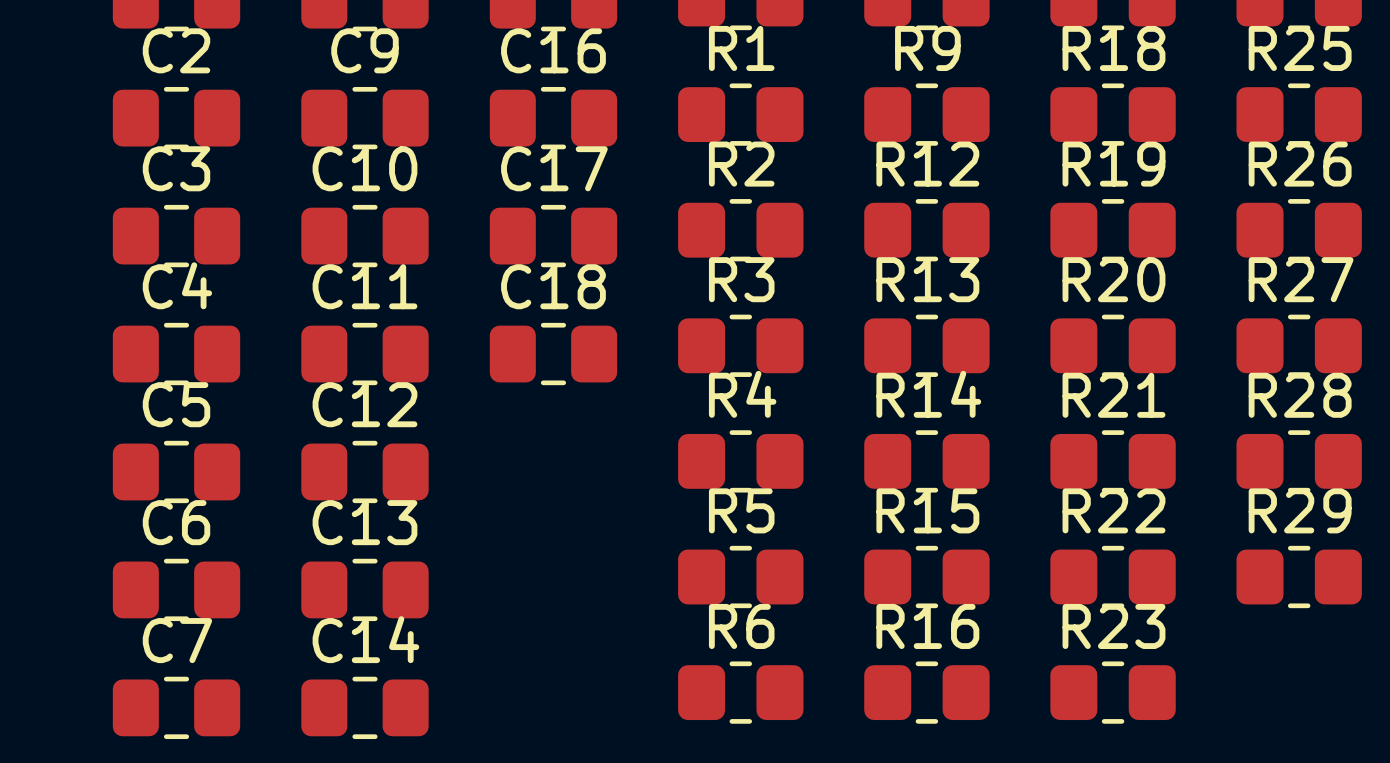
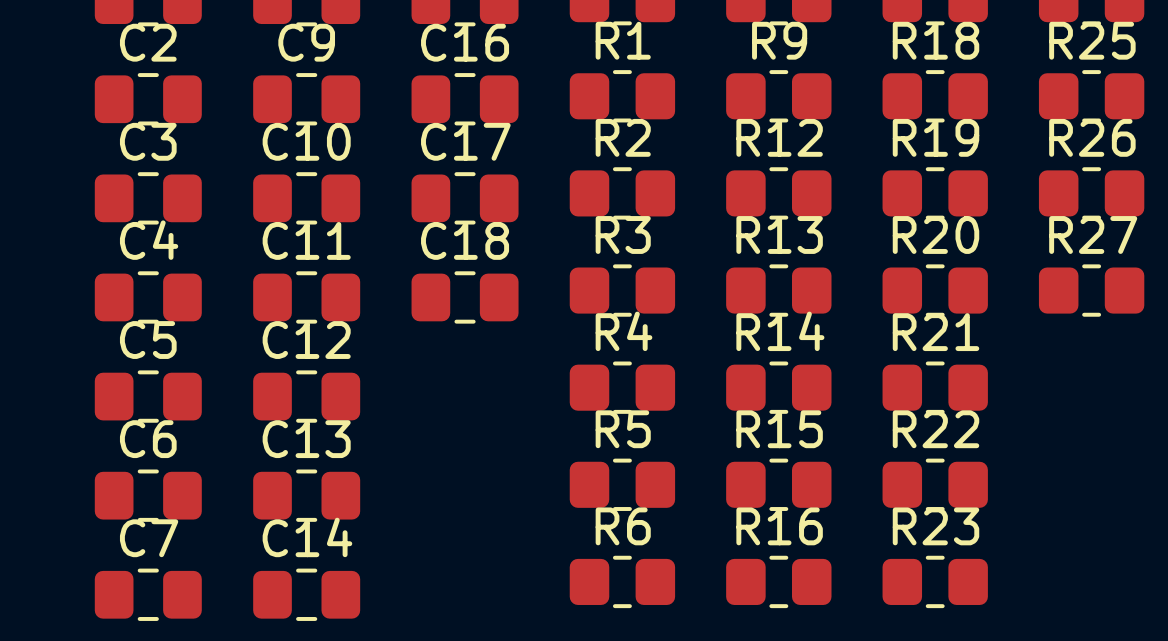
R28: (1299, 461) -> none
R29: (1299, 576) -> none

